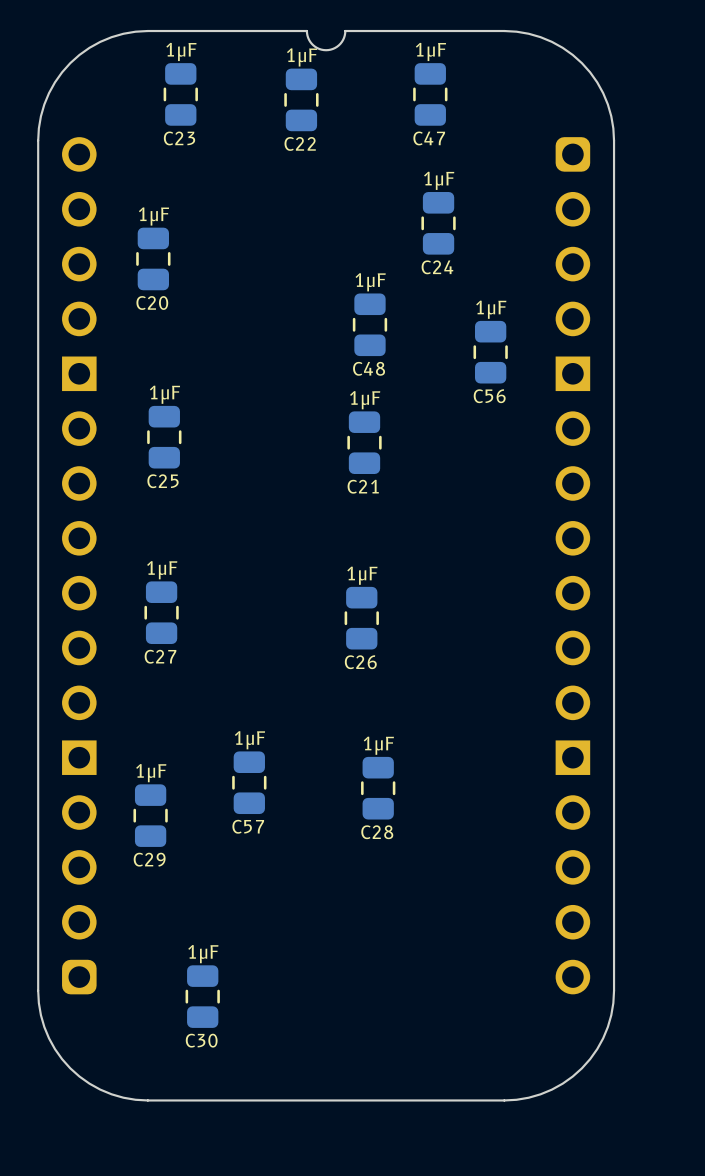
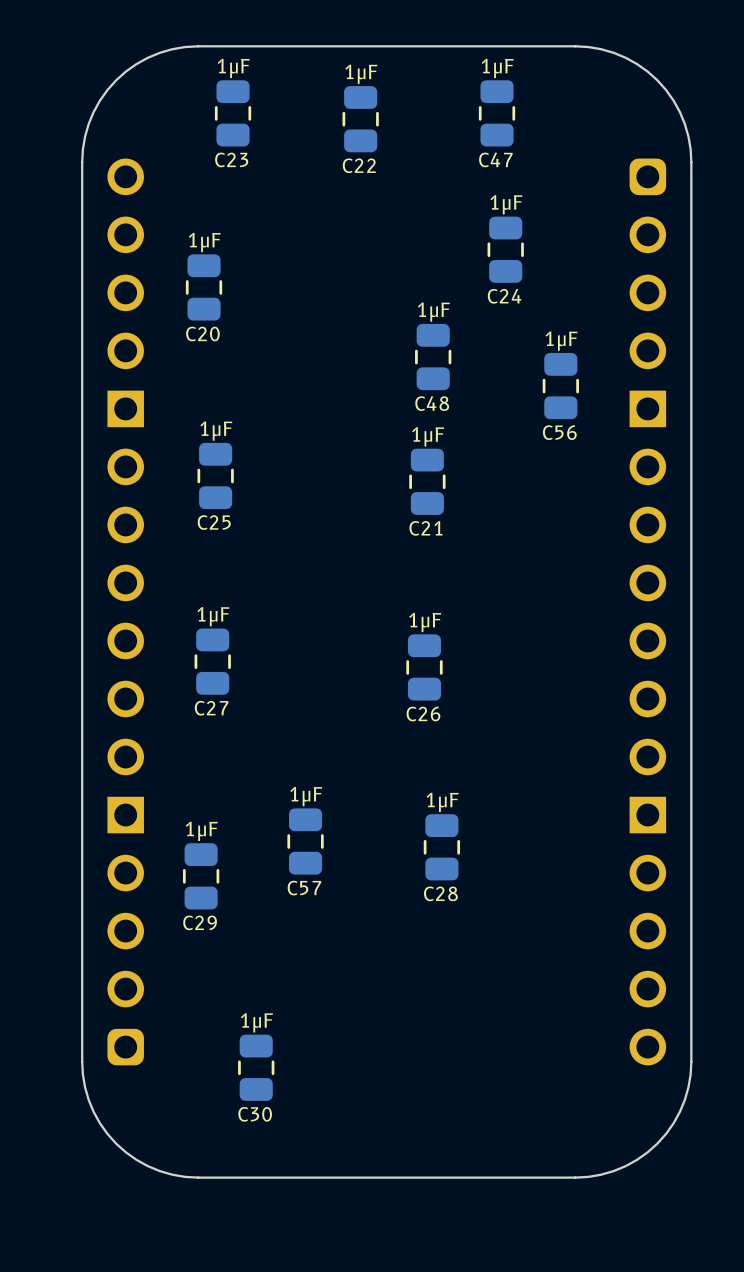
part footprint: [37, 29, 616, 1102] -> [81, 45, 693, 1179]

